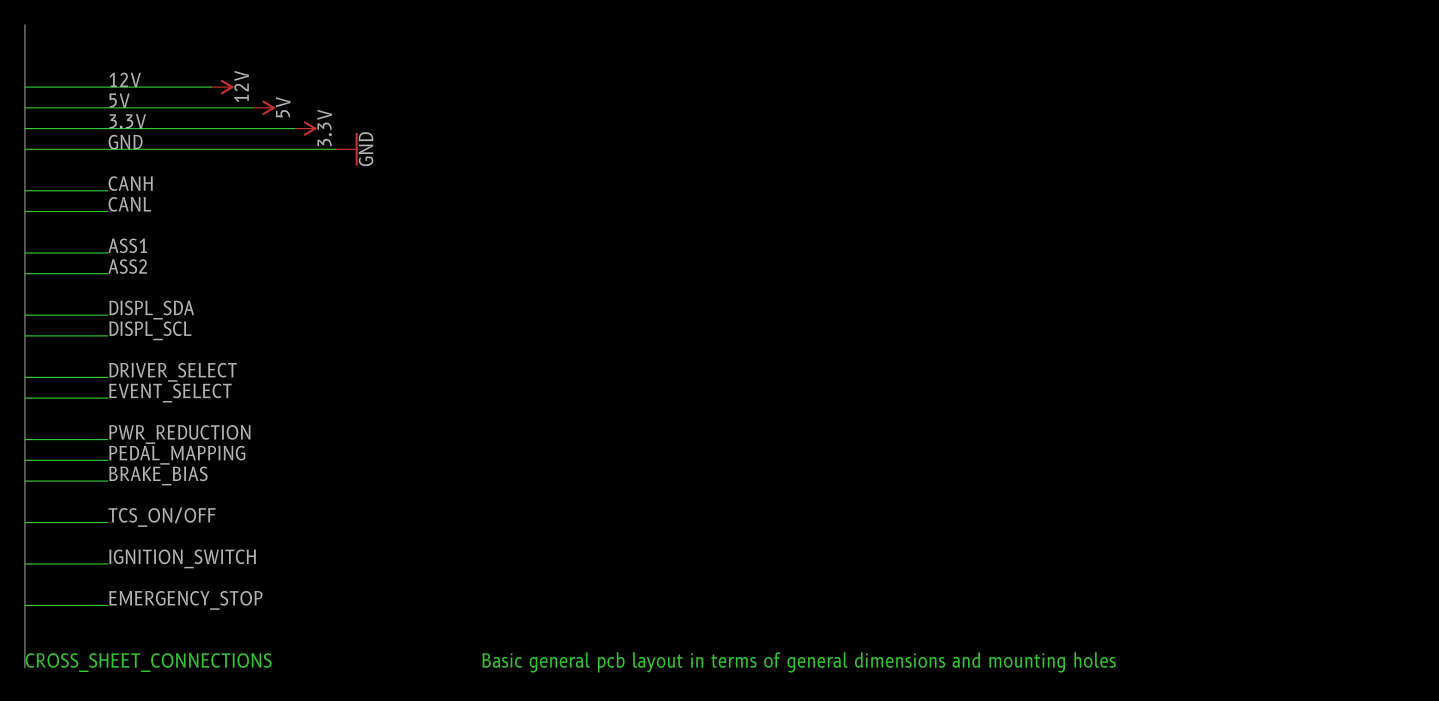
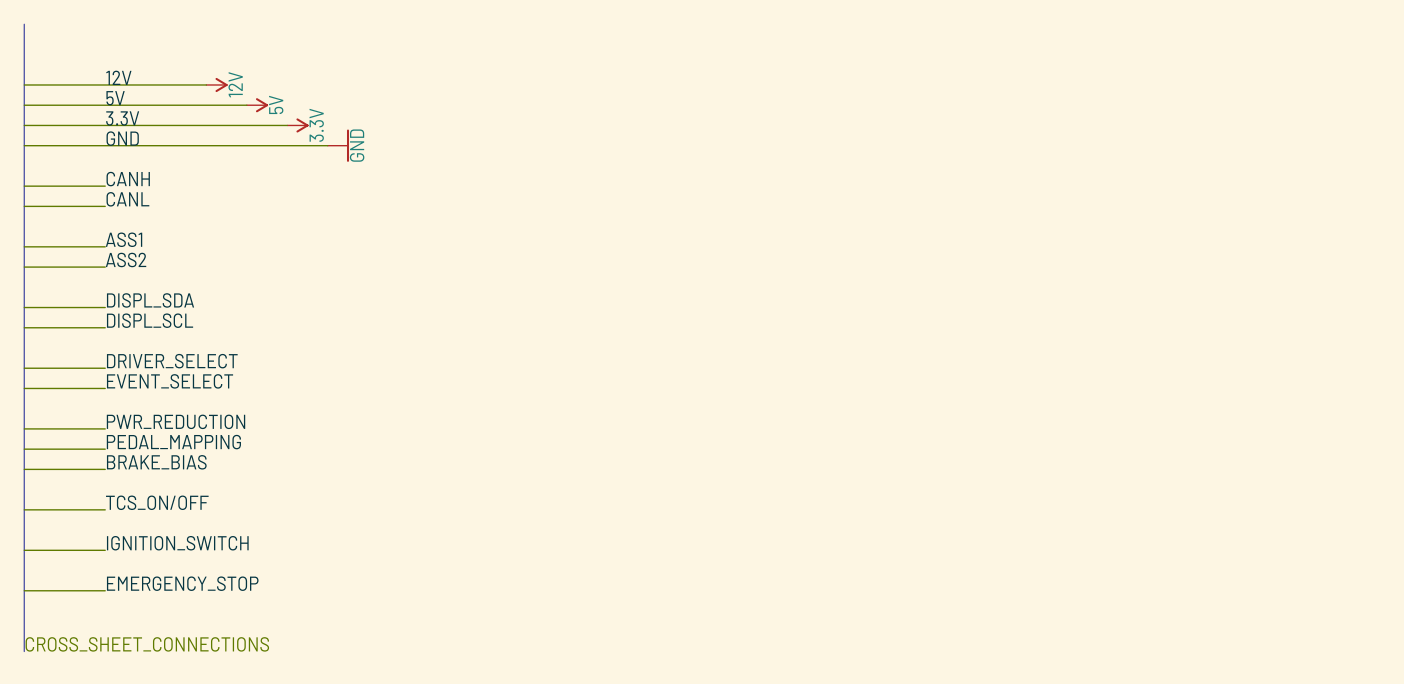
text: Basic general pcb layout in terms of general dimensions and mounting holes (799, 662) -> none

